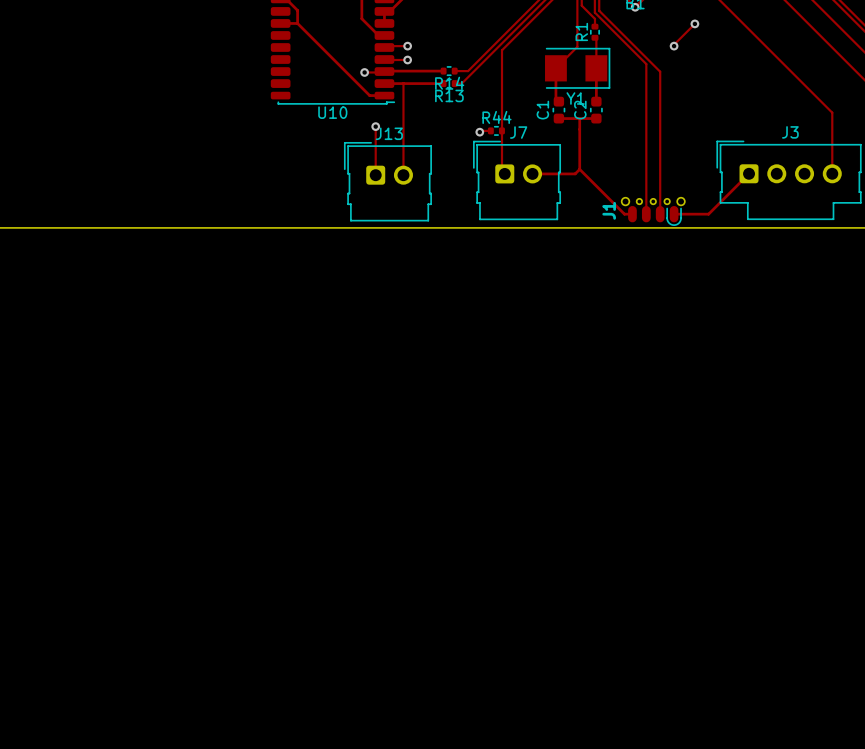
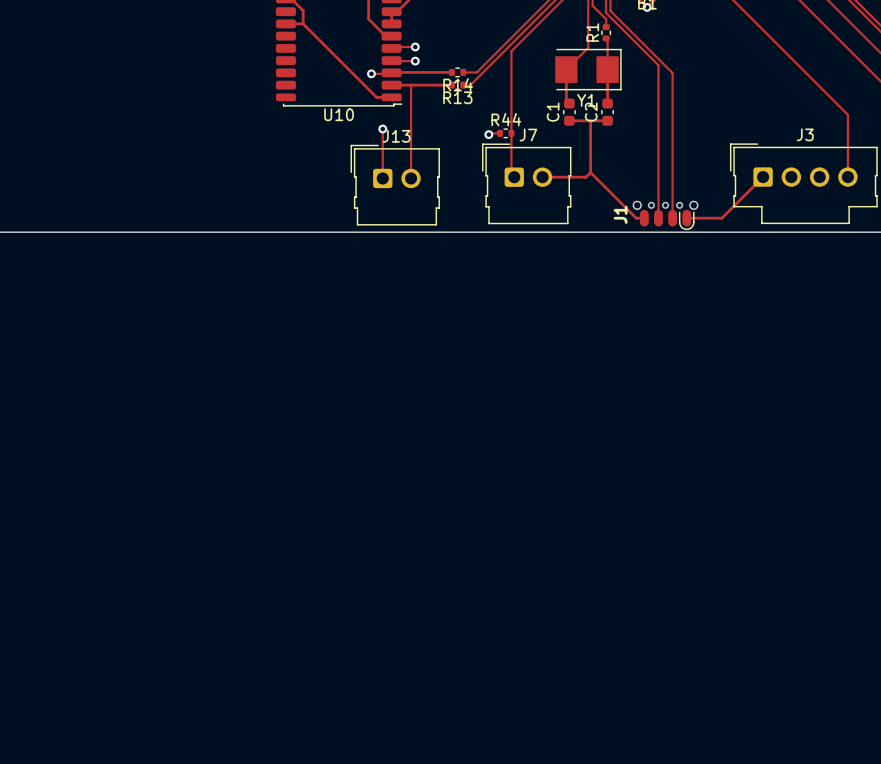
track: (694, 23) (674, 46) -> none
via: (694, 23) -> none
via: (674, 46) -> none

